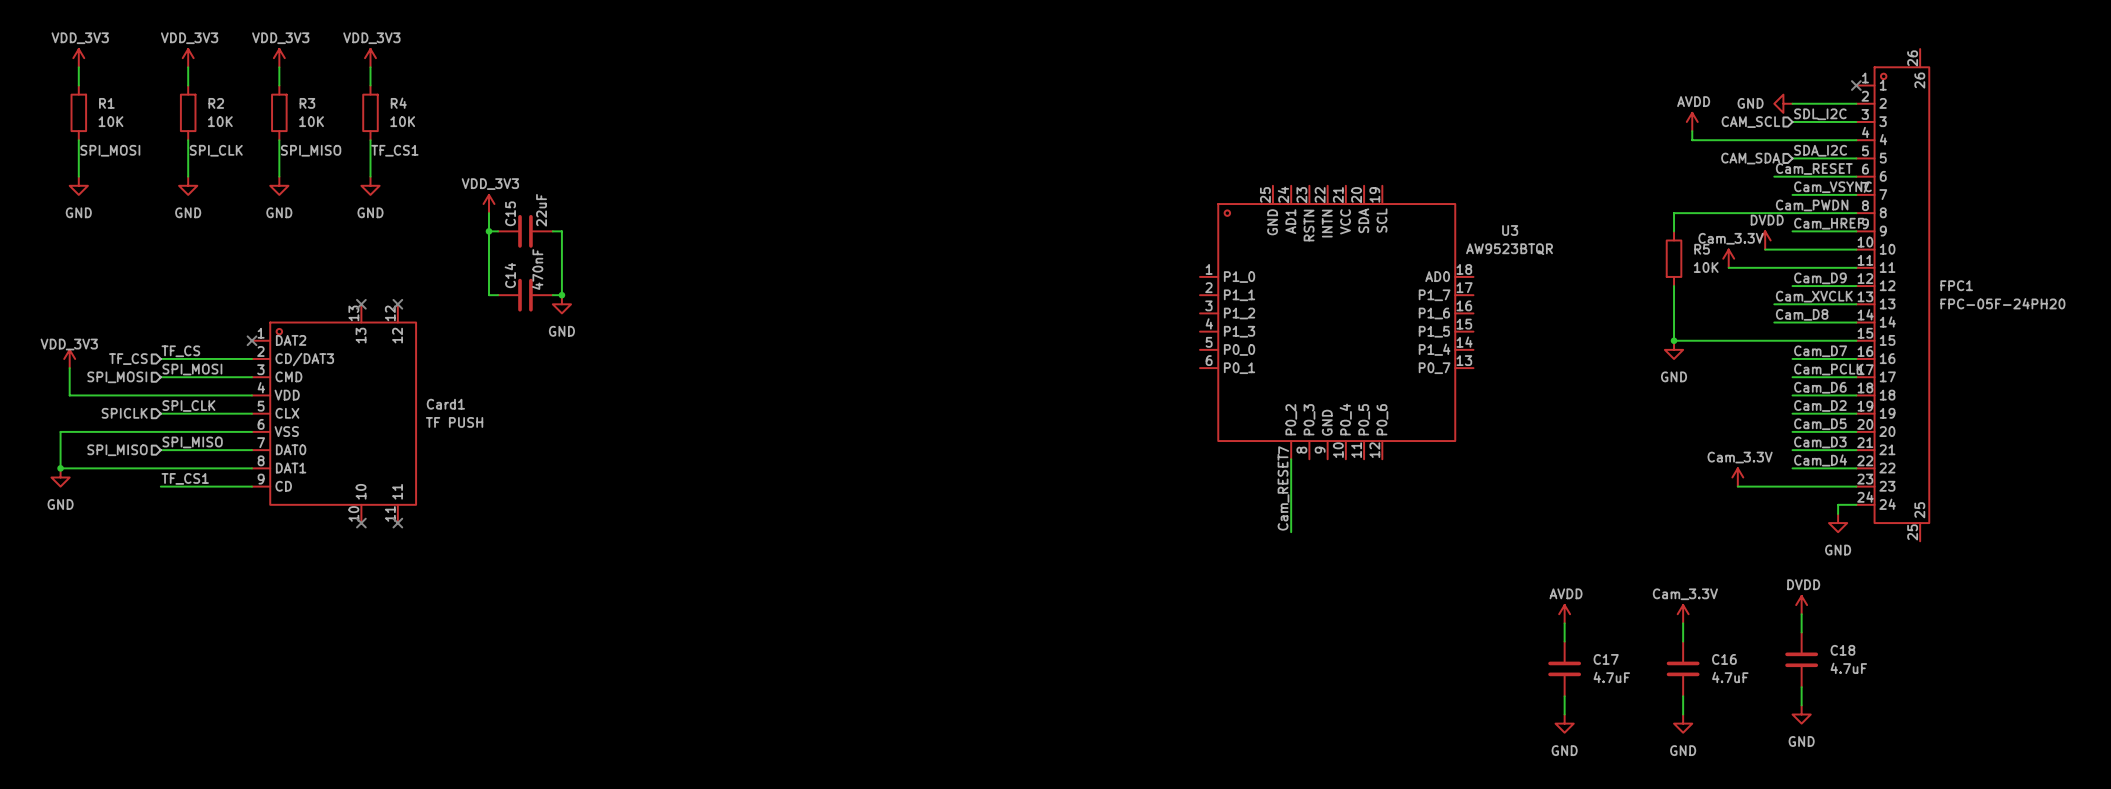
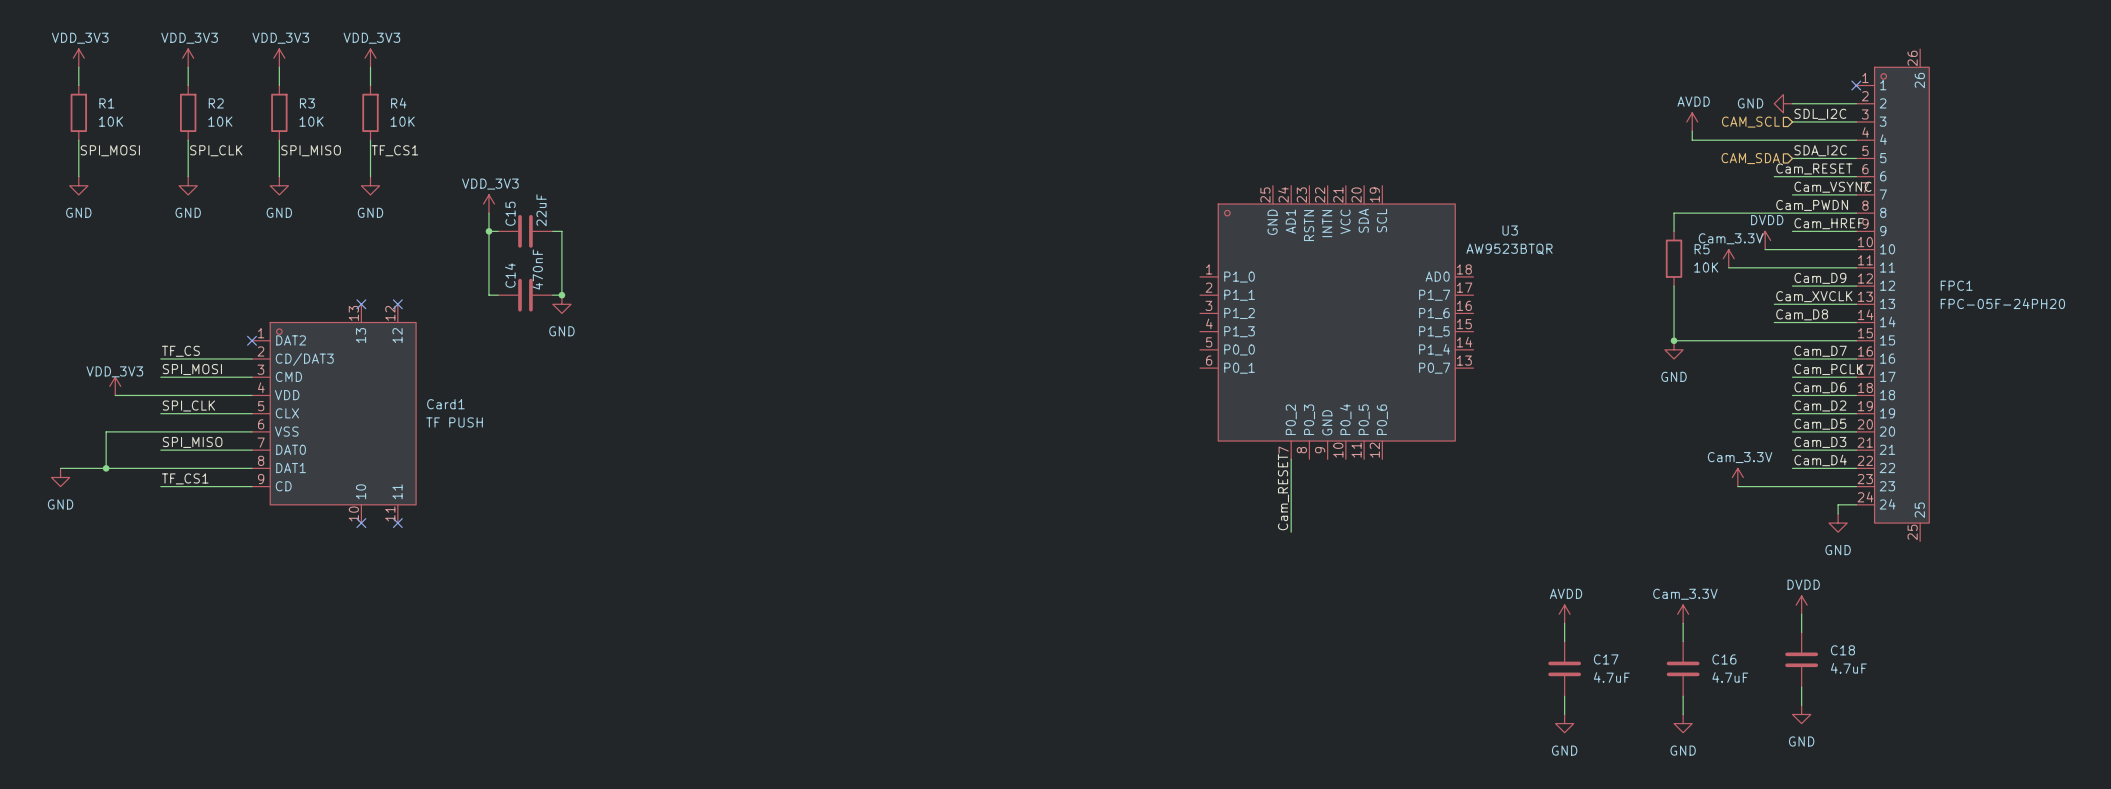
power symbol position: VDD_3V3 (69, 358) -> VDD_3V3 (115, 386)
hierarchical label: TF_CS (128, 359) -> none
wire: (69, 368) (69, 395) (115, 395) -> none
hierarchical label: SPI_MOSI (117, 377) -> none
hierarchical label: SPICLK (124, 413) -> none
wire: (106, 431) (60, 431) (60, 468) -> (106, 431) (106, 468)
hierarchical label: SPI_MISO (117, 450) -> none
junction: (60, 468) -> none
junction: none -> (106, 468)

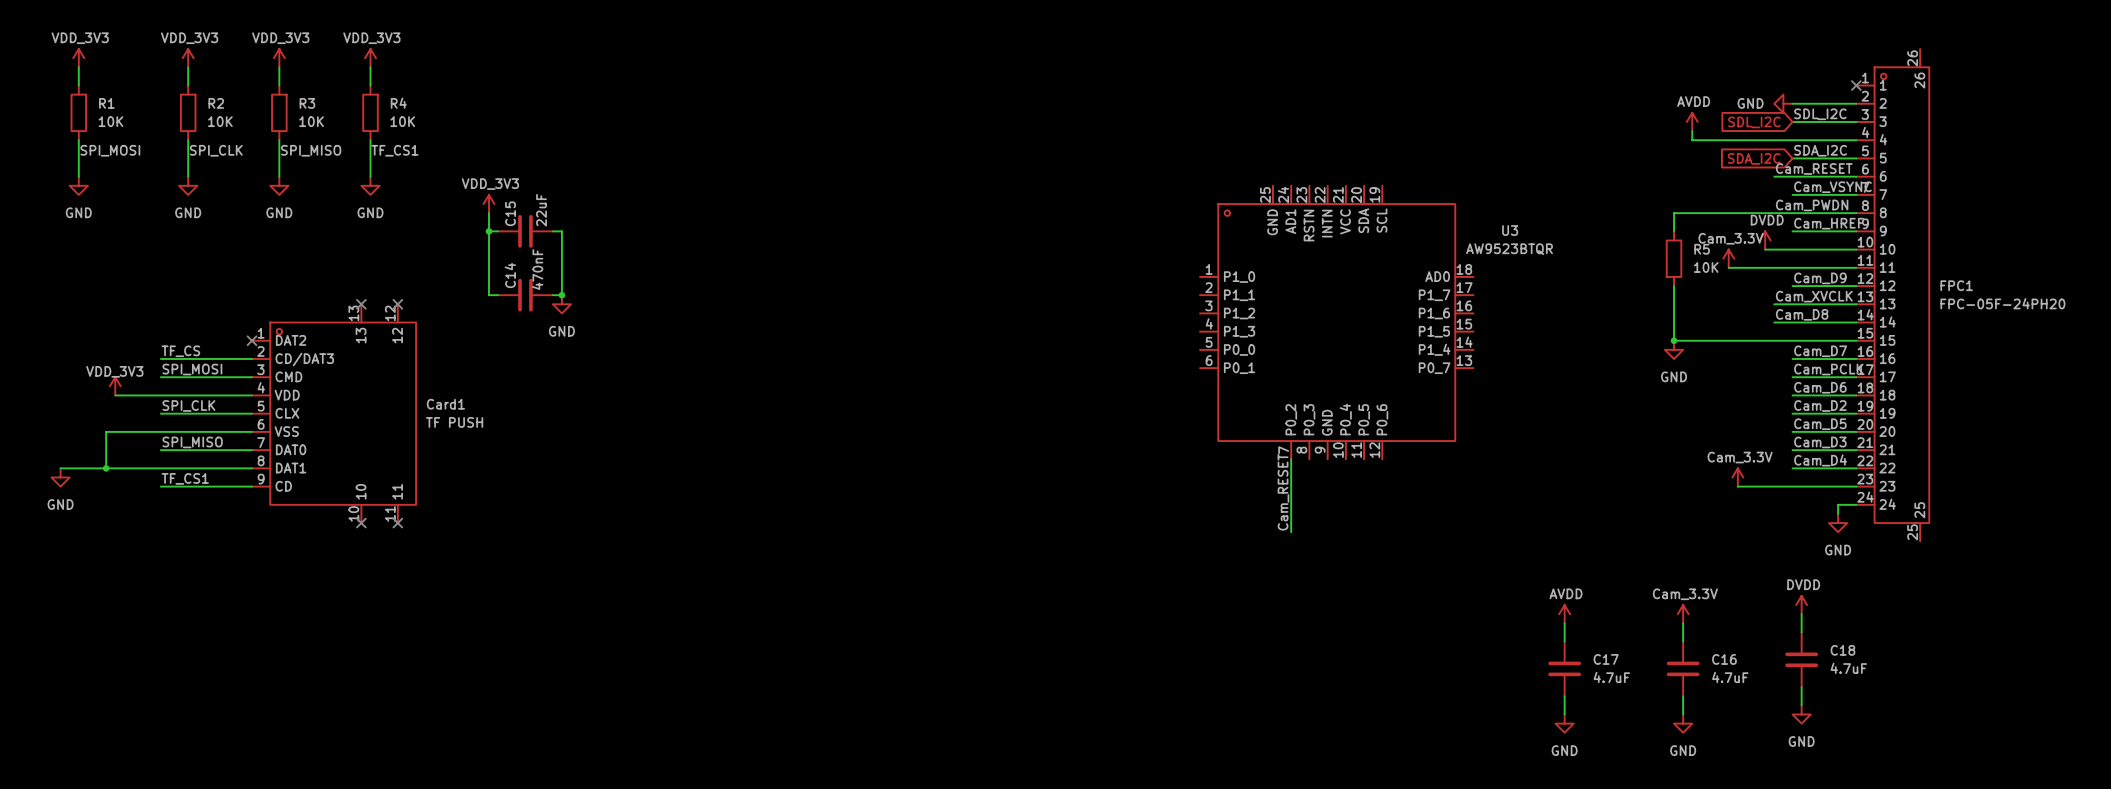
hierarchical label: CAM_SCL (1750, 122) -> none
global label: none -> SDL_I2C (1754, 122)
hierarchical label: CAM_SDA (1750, 158) -> none
global label: none -> SDA_I2C (1754, 158)

